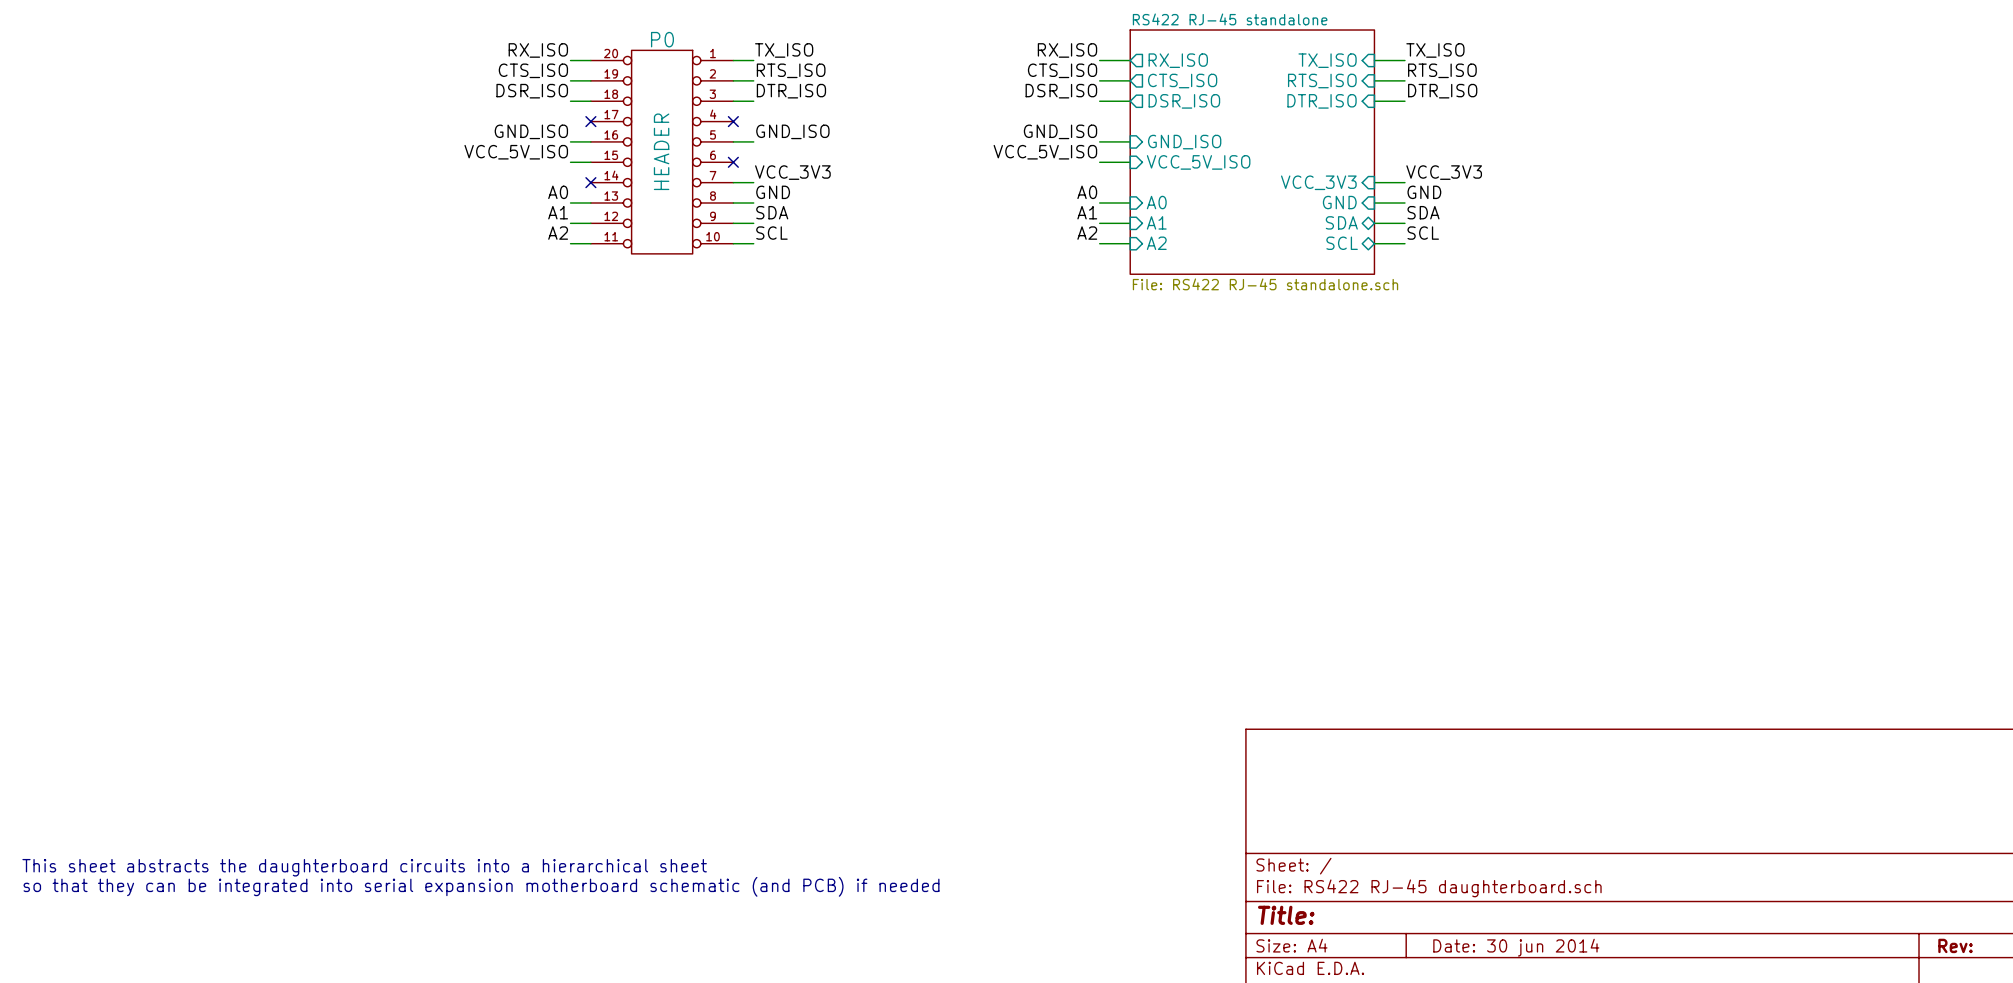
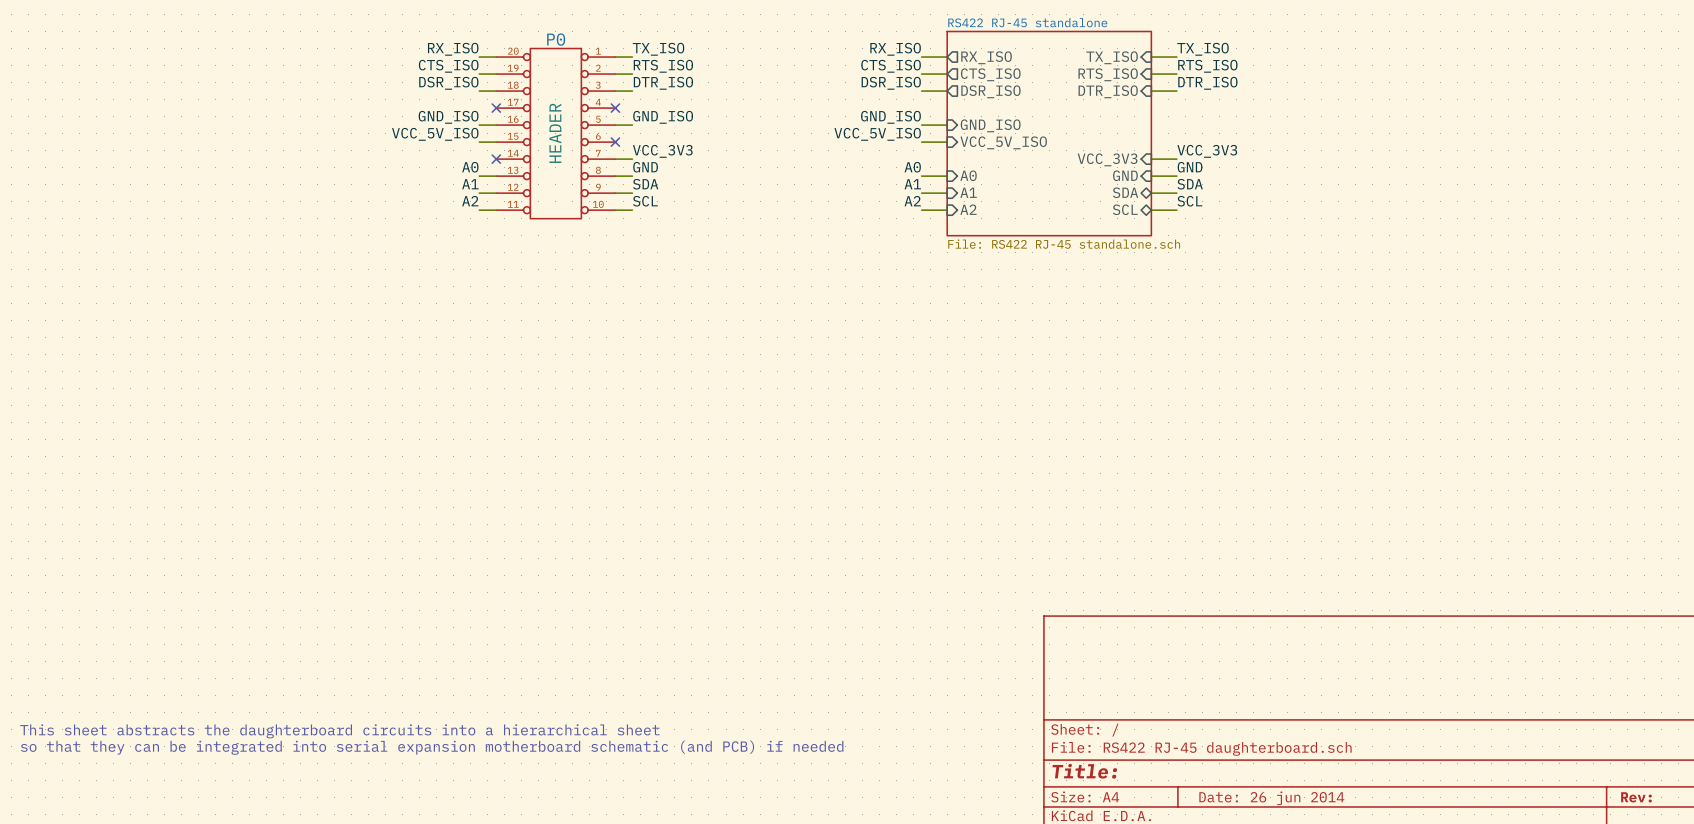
title block: Date: 30 jun 2014 (1516, 947) -> Date: 26 jun 2014 (1271, 798)

